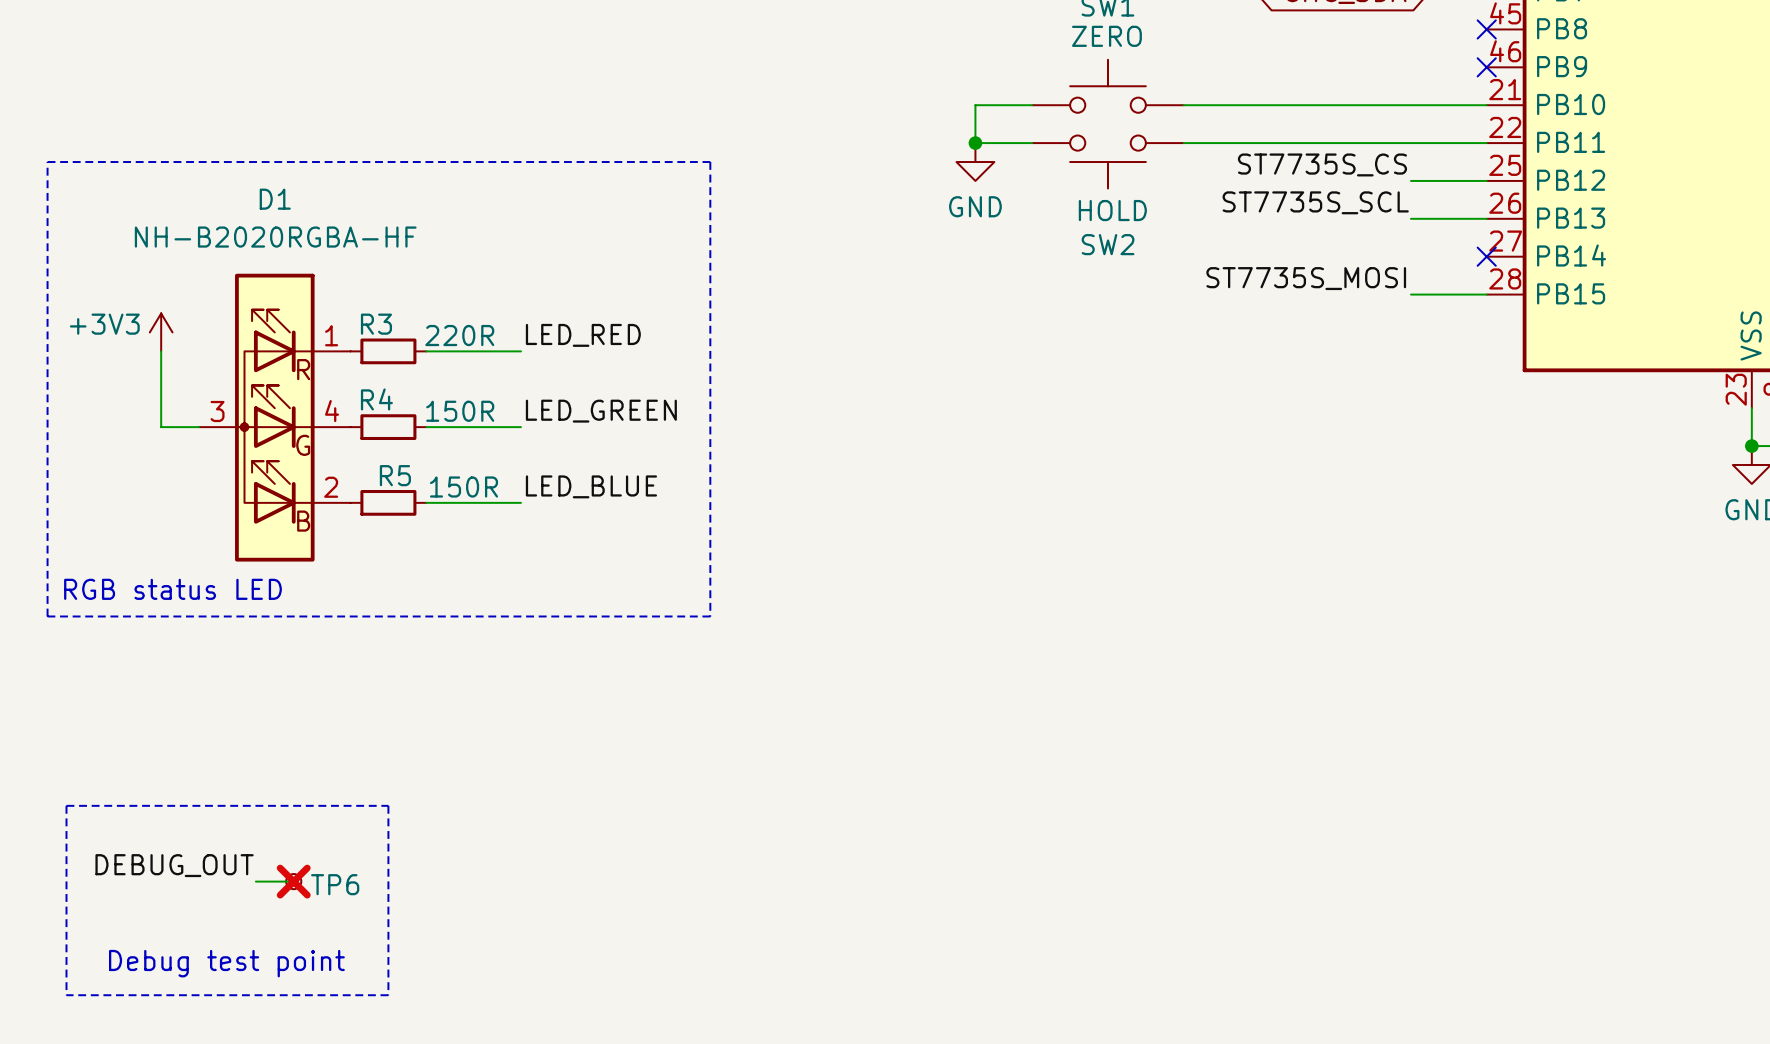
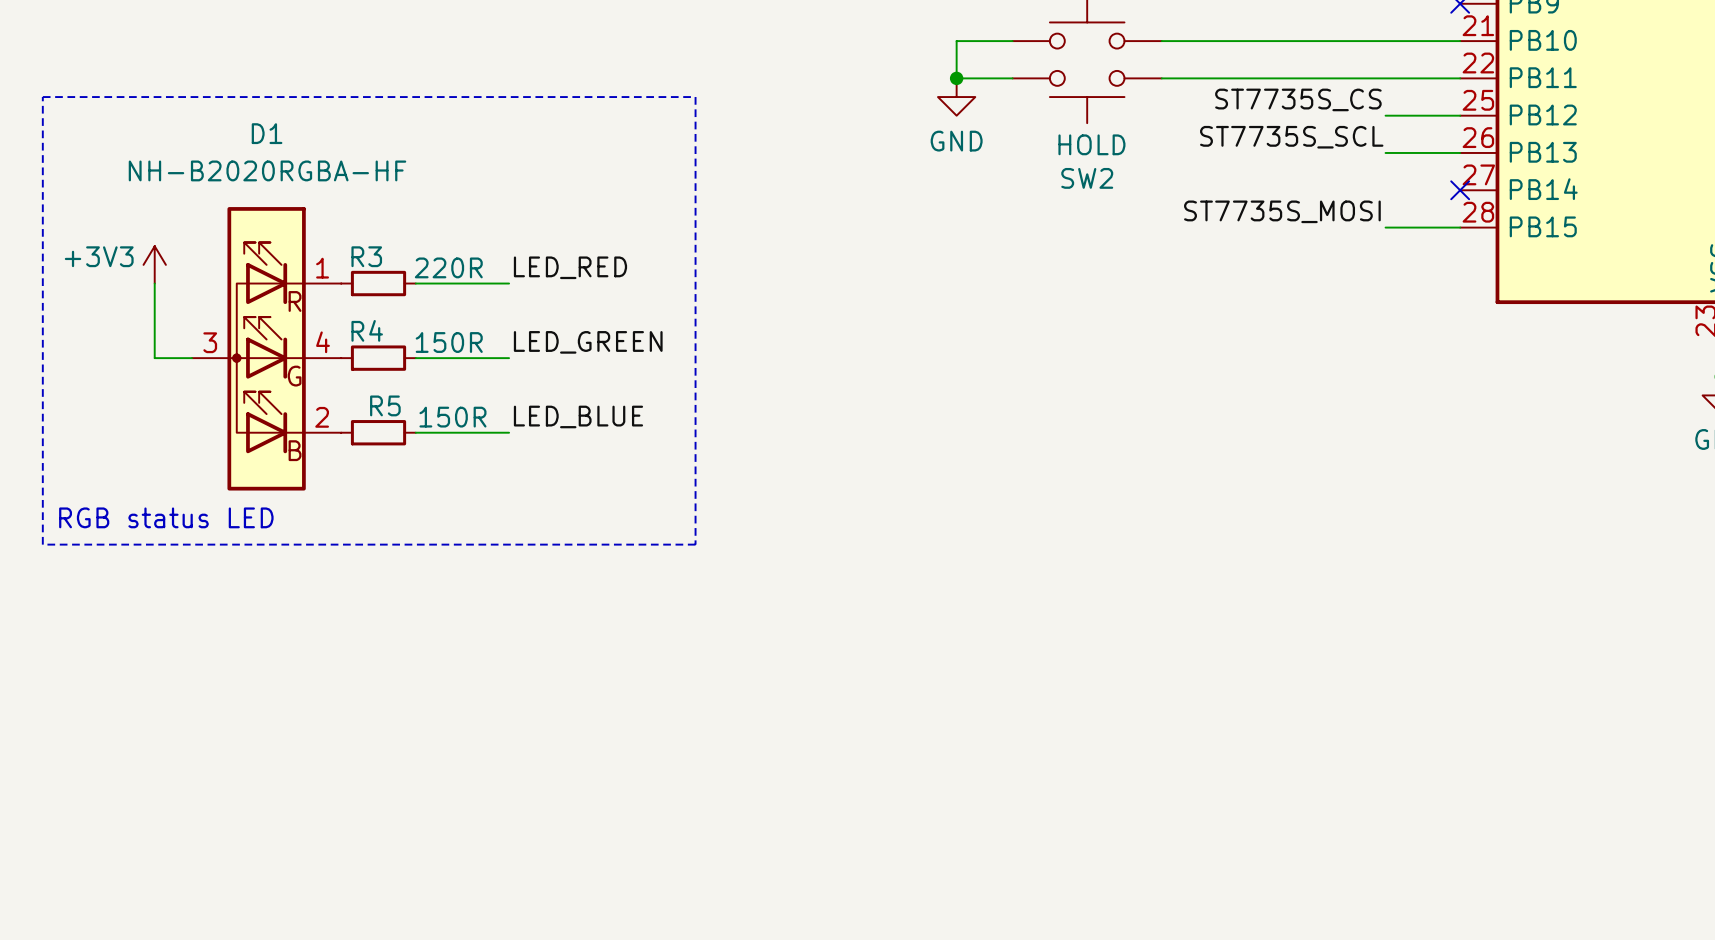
line: (66, 805) (388, 805) (388, 995) (66, 995) (66, 805) -> none
label: DEBUG_OUT (174, 865) -> none
wire: (255, 881) (293, 881) -> none
TP6: (293, 881) -> none
text: Debug test point (226, 963) -> none

